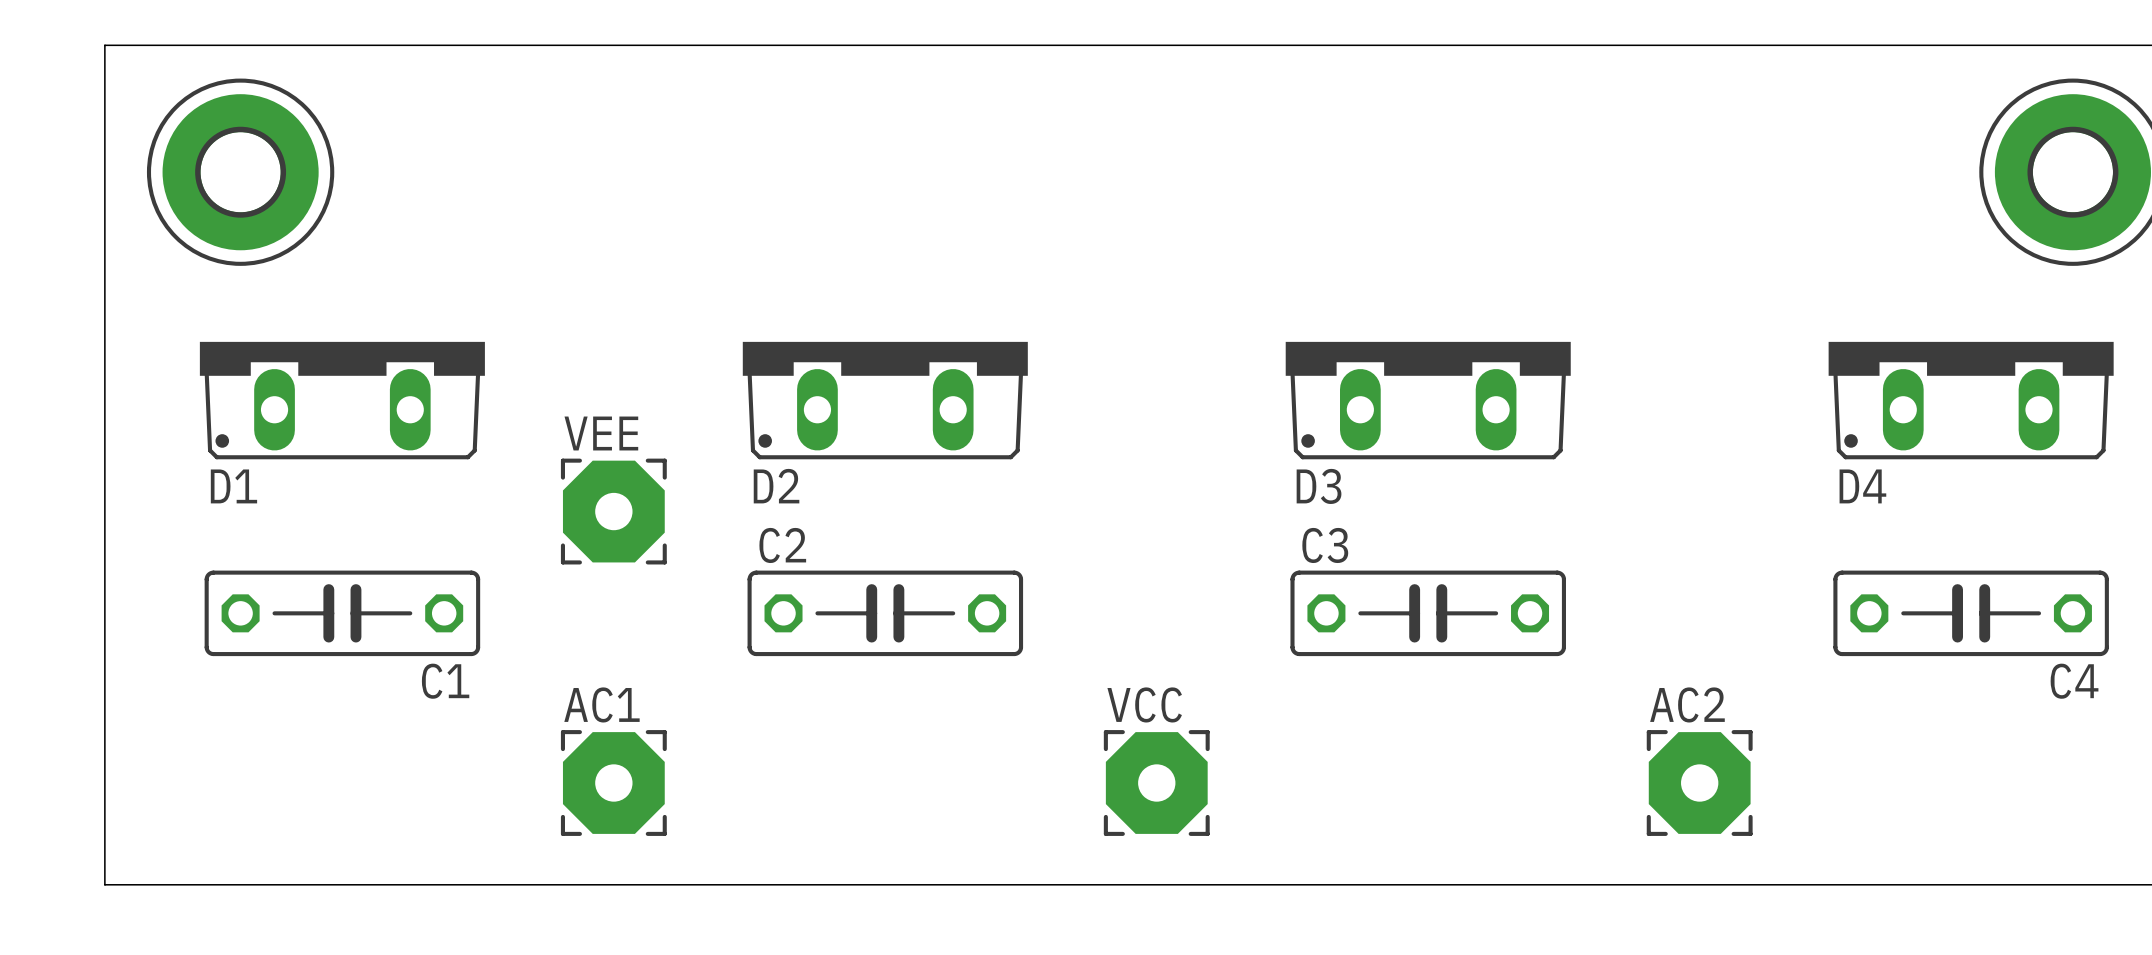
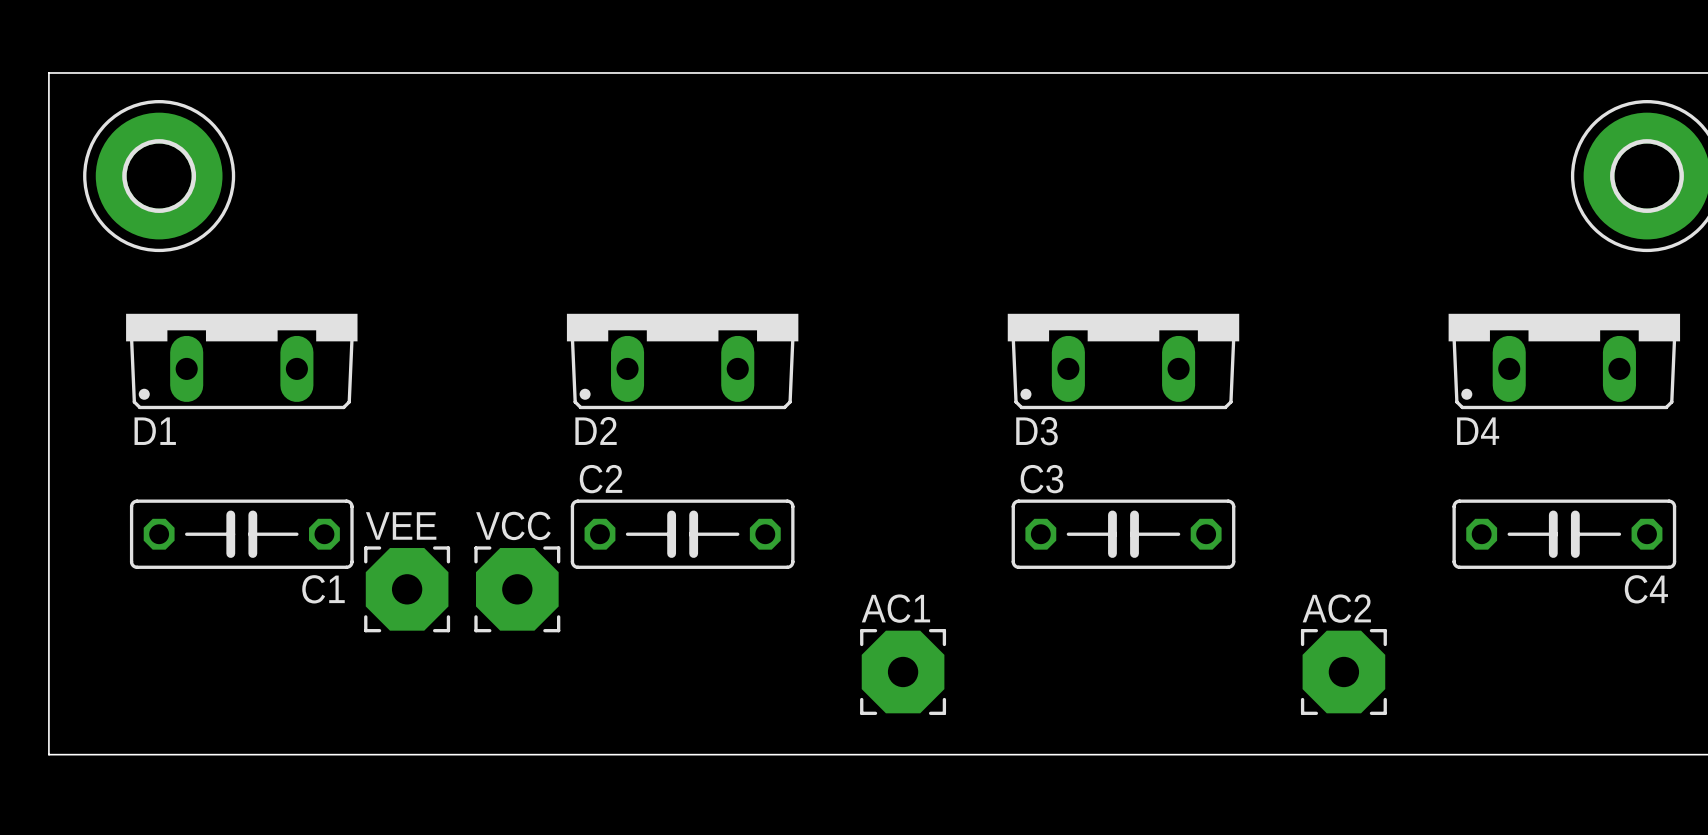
VEE position: (613, 511) -> (407, 589)
VCC: none -> (517, 589)
VCC name: VCC (1144, 704) -> AC1 (895, 608)
AC1: (613, 783) -> none

